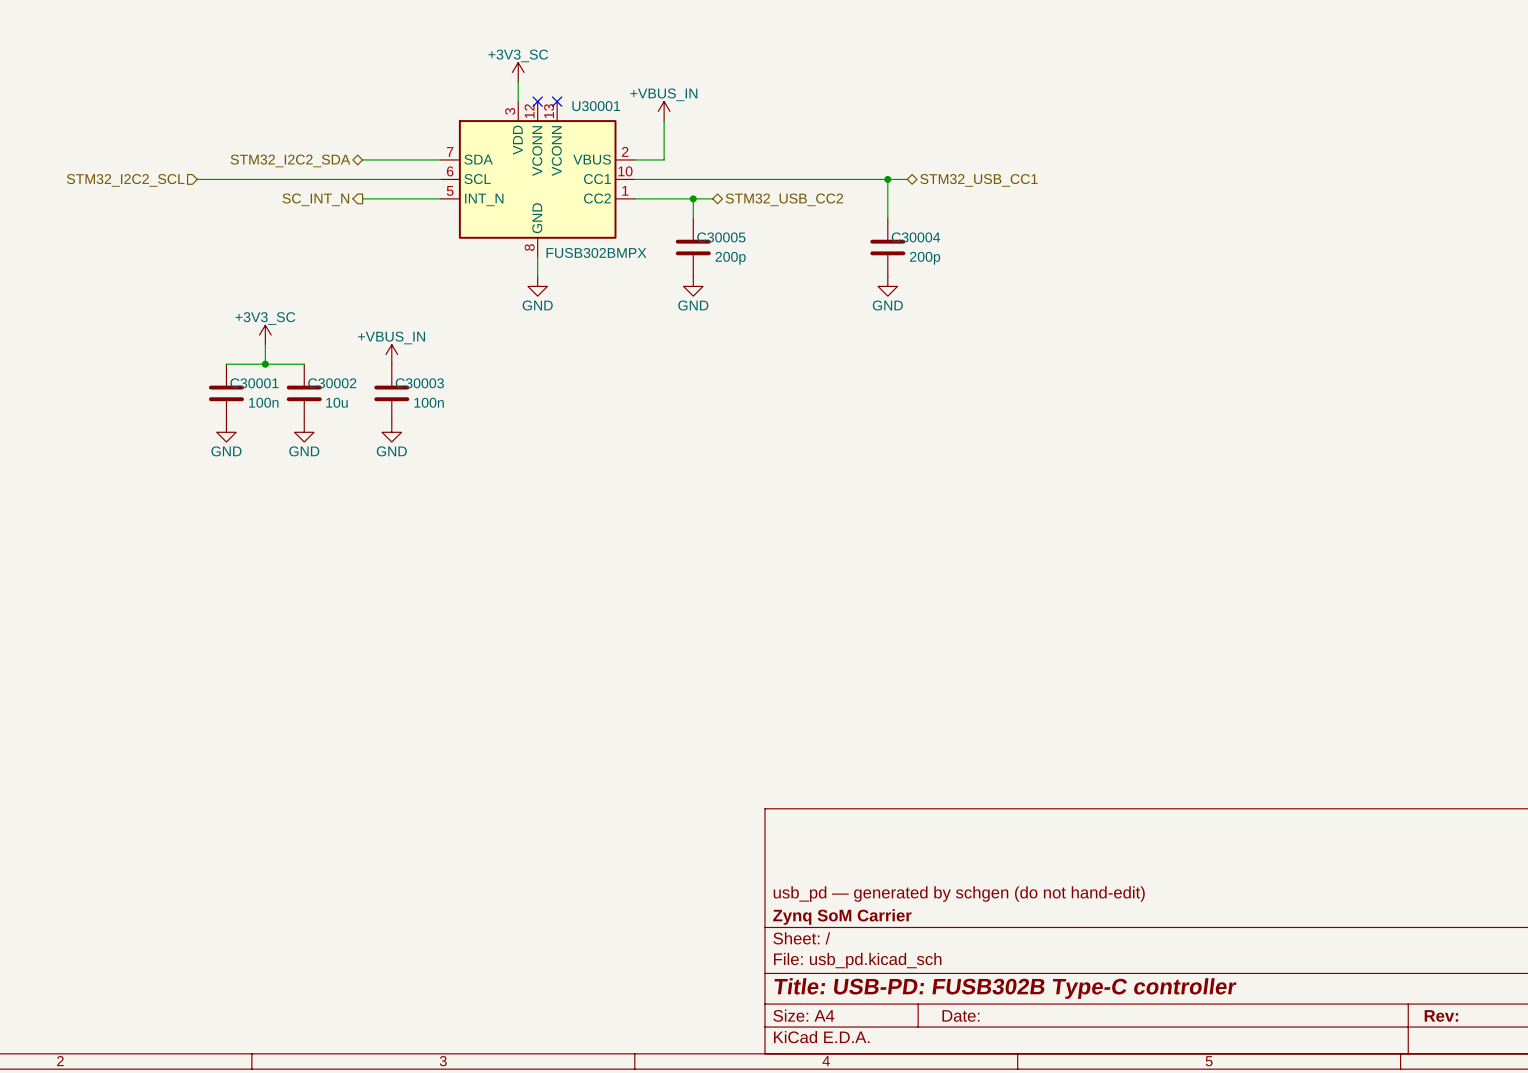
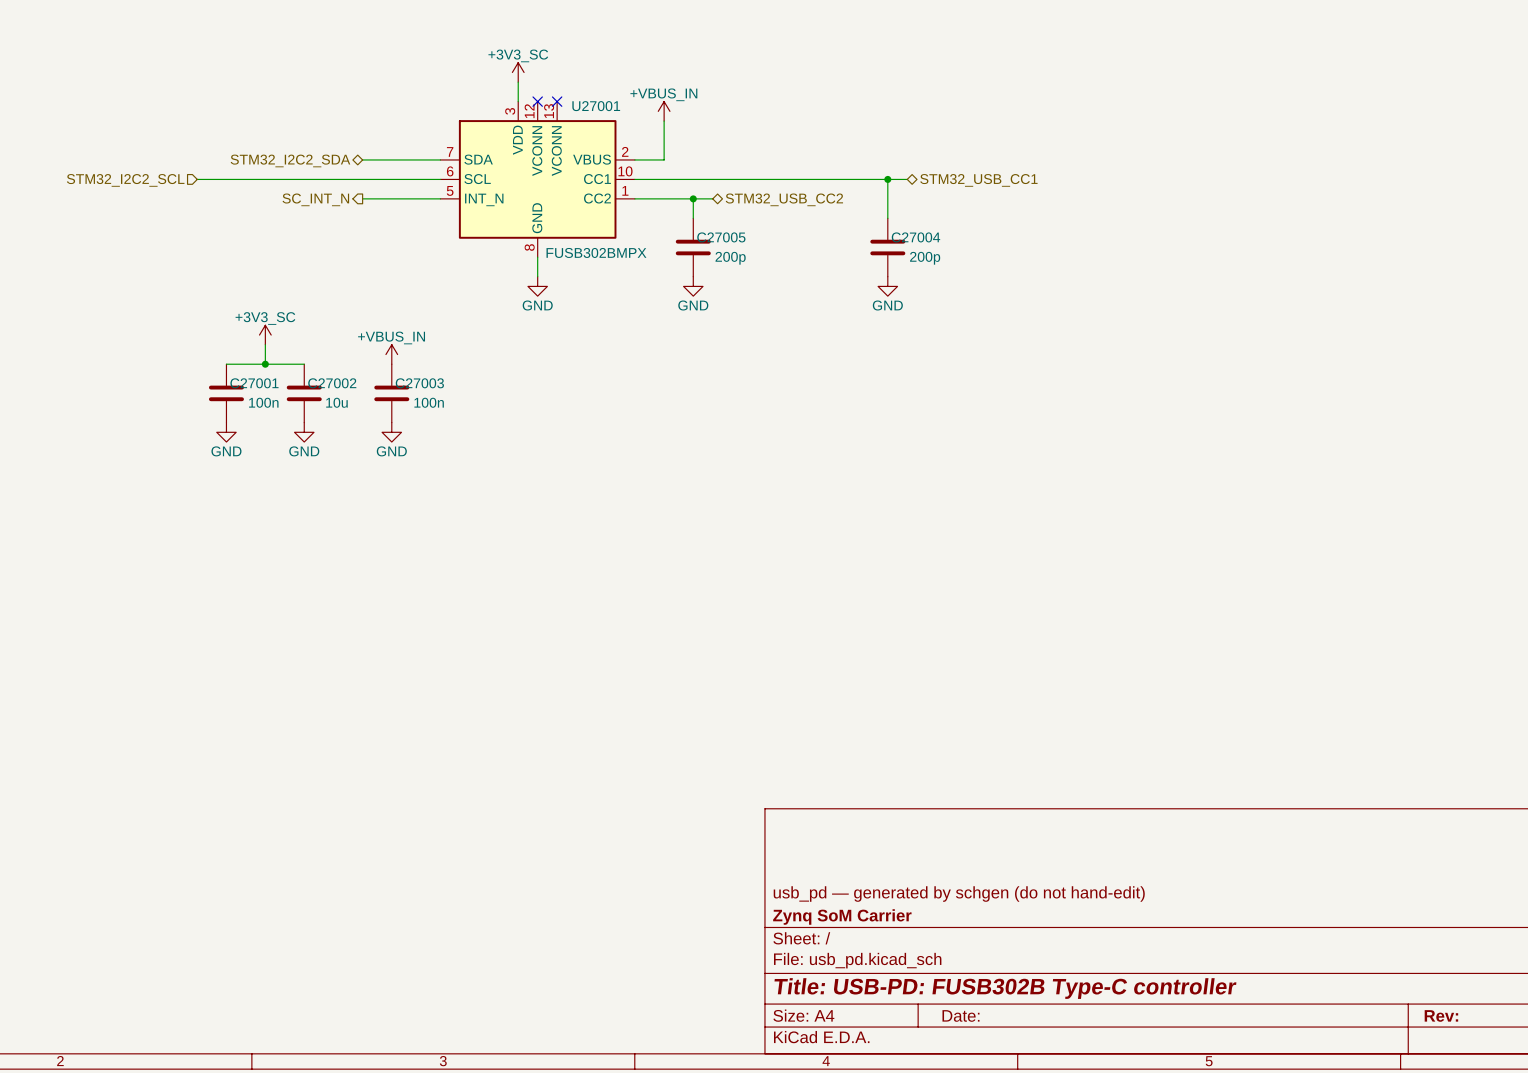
U30001 name: U30001 (596, 106) -> U27001 (596, 106)
C30005 name: C30005 (721, 237) -> C27005 (721, 237)
C30004 name: C30004 (915, 237) -> C27004 (915, 237)
C30001 name: C30001 (254, 383) -> C27001 (254, 383)
C30002 name: C30002 (332, 383) -> C27002 (332, 383)
C30003 name: C30003 (419, 383) -> C27003 (419, 383)

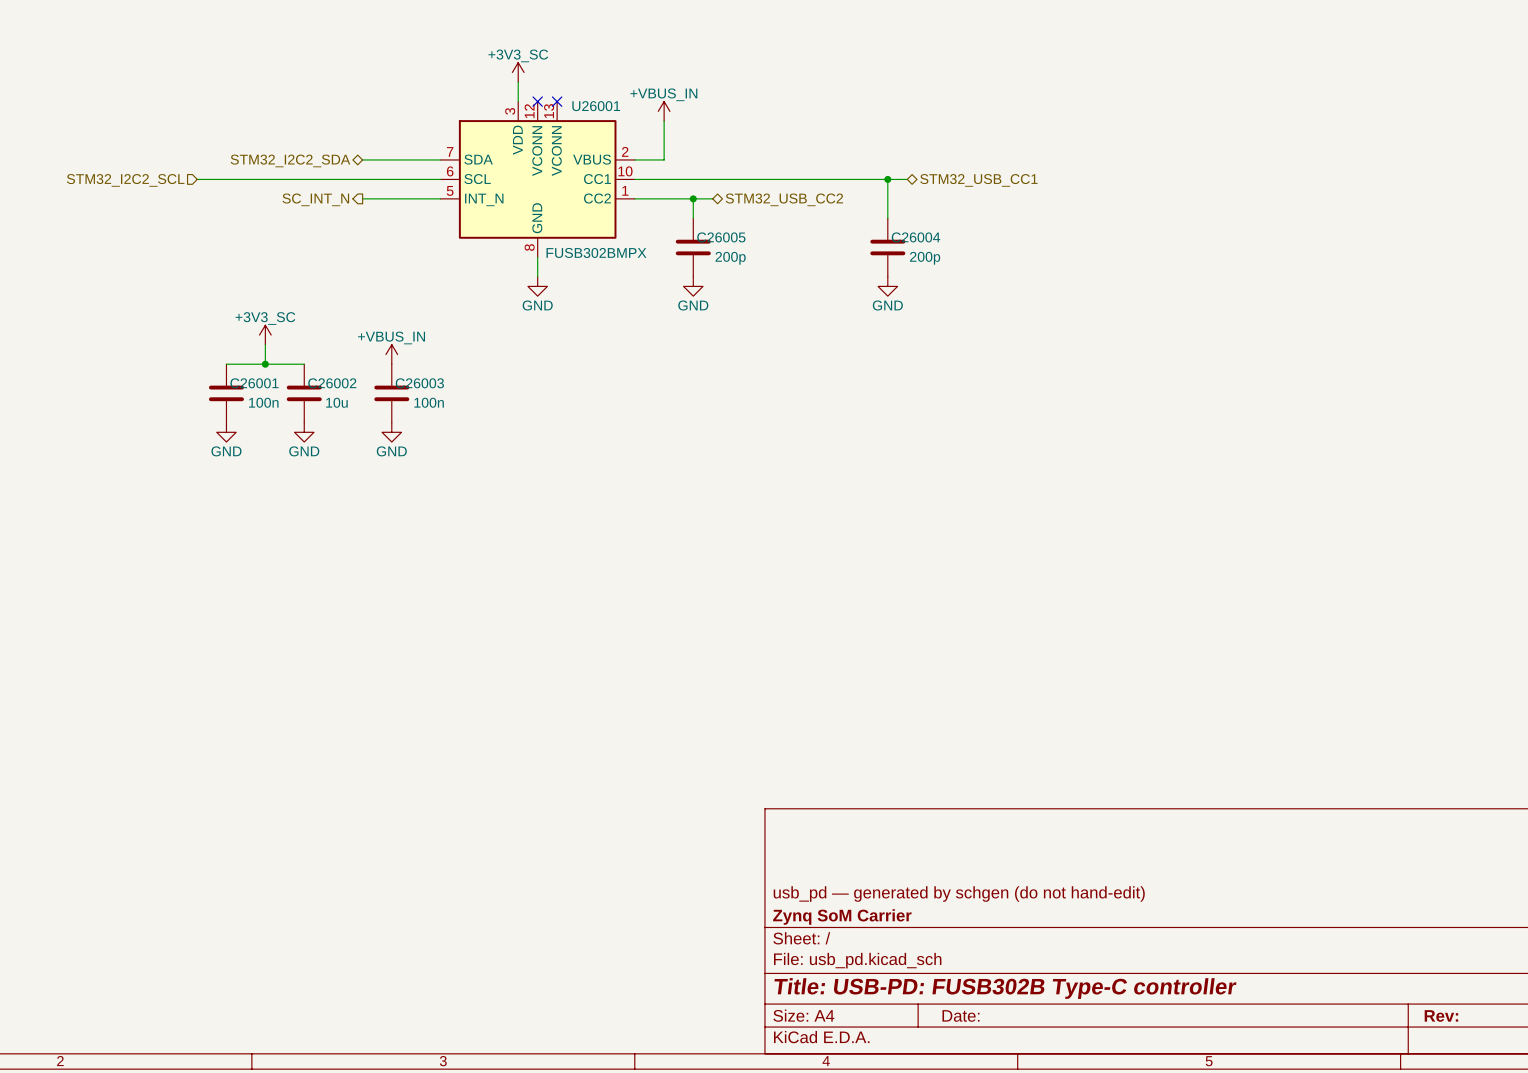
U27001 name: U27001 (596, 106) -> U26001 (596, 106)
C27005 name: C27005 (721, 237) -> C26005 (721, 237)
C27004 name: C27004 (915, 237) -> C26004 (915, 237)
C27001 name: C27001 (254, 383) -> C26001 (254, 383)
C27002 name: C27002 (332, 383) -> C26002 (332, 383)
C27003 name: C27003 (419, 383) -> C26003 (419, 383)

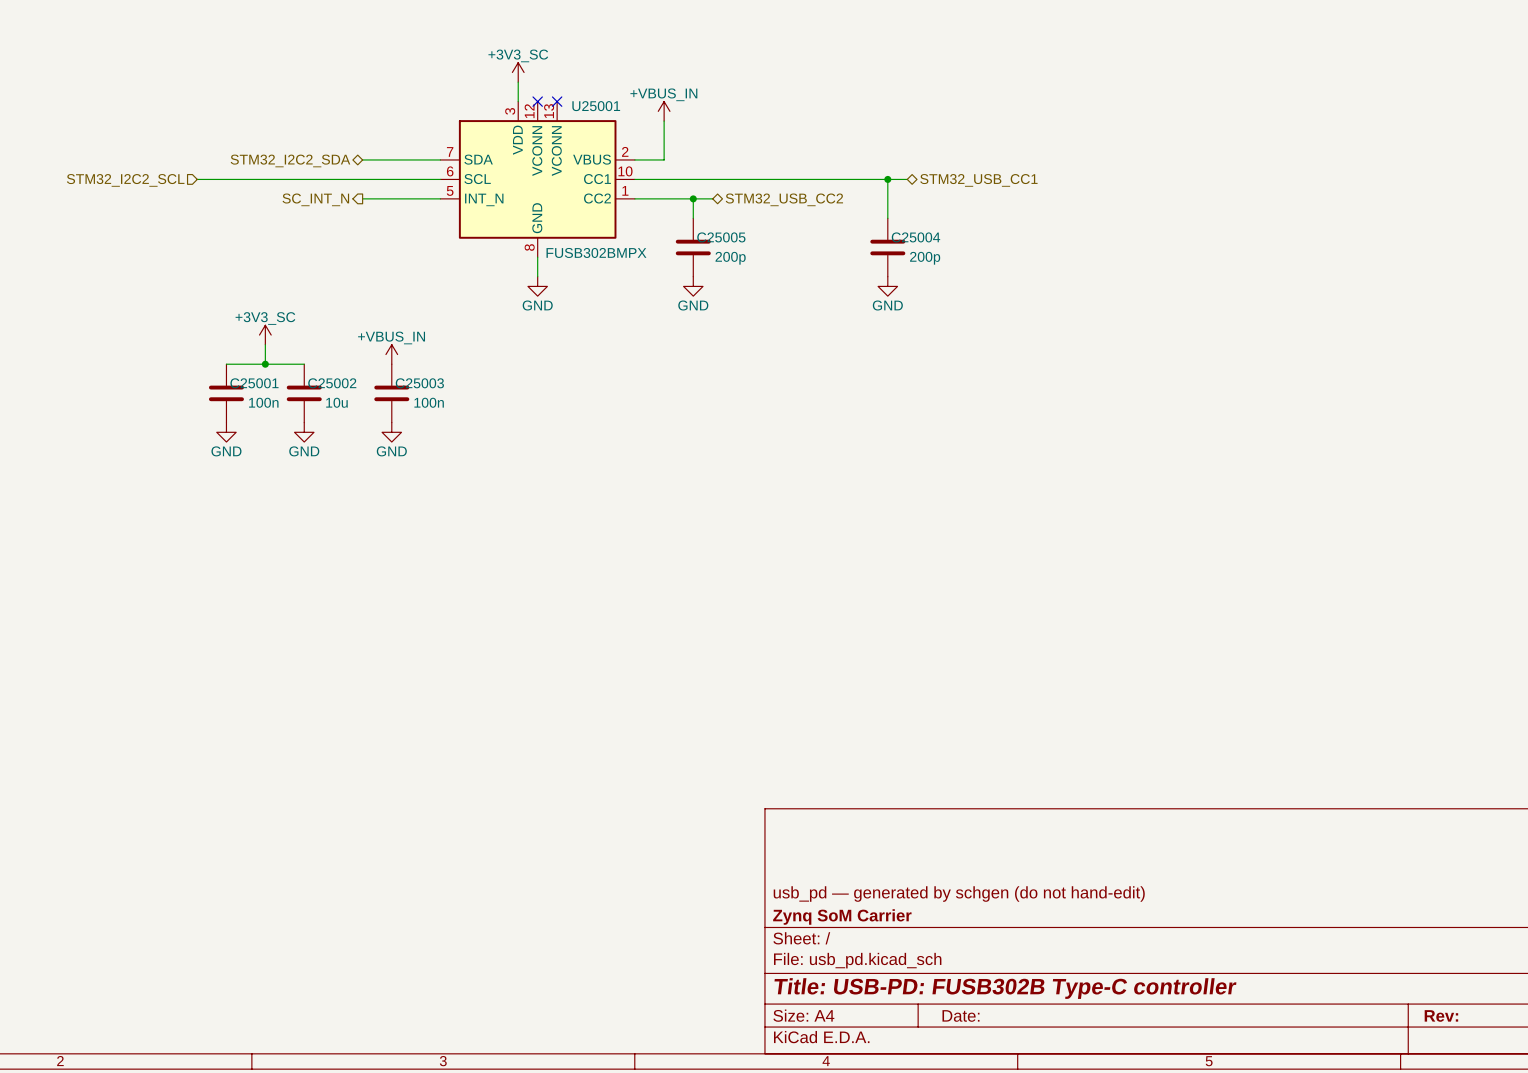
U26001 name: U26001 (596, 106) -> U25001 (596, 106)
C26005 name: C26005 (721, 237) -> C25005 (721, 237)
C26004 name: C26004 (915, 237) -> C25004 (915, 237)
C26001 name: C26001 (254, 383) -> C25001 (254, 383)
C26002 name: C26002 (332, 383) -> C25002 (332, 383)
C26003 name: C26003 (419, 383) -> C25003 (419, 383)

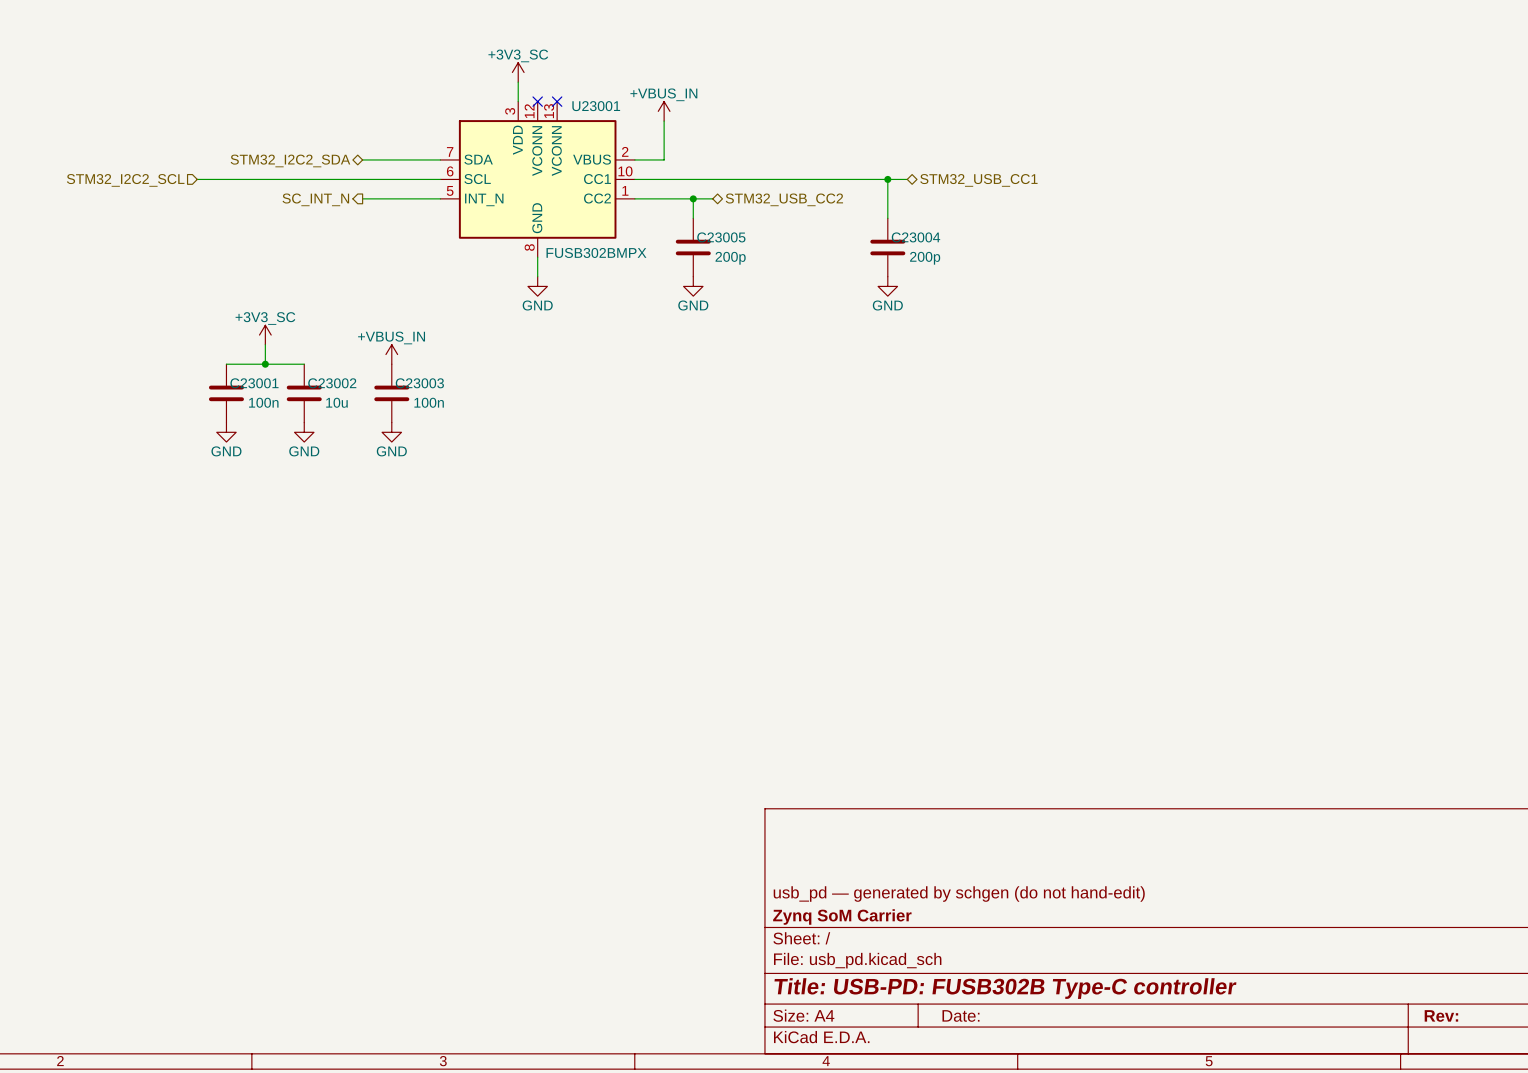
U25001 name: U25001 (596, 106) -> U23001 (596, 106)
C25005 name: C25005 (721, 237) -> C23005 (721, 237)
C25004 name: C25004 (915, 237) -> C23004 (915, 237)
C25001 name: C25001 (254, 383) -> C23001 (254, 383)
C25002 name: C25002 (332, 383) -> C23002 (332, 383)
C25003 name: C25003 (419, 383) -> C23003 (419, 383)

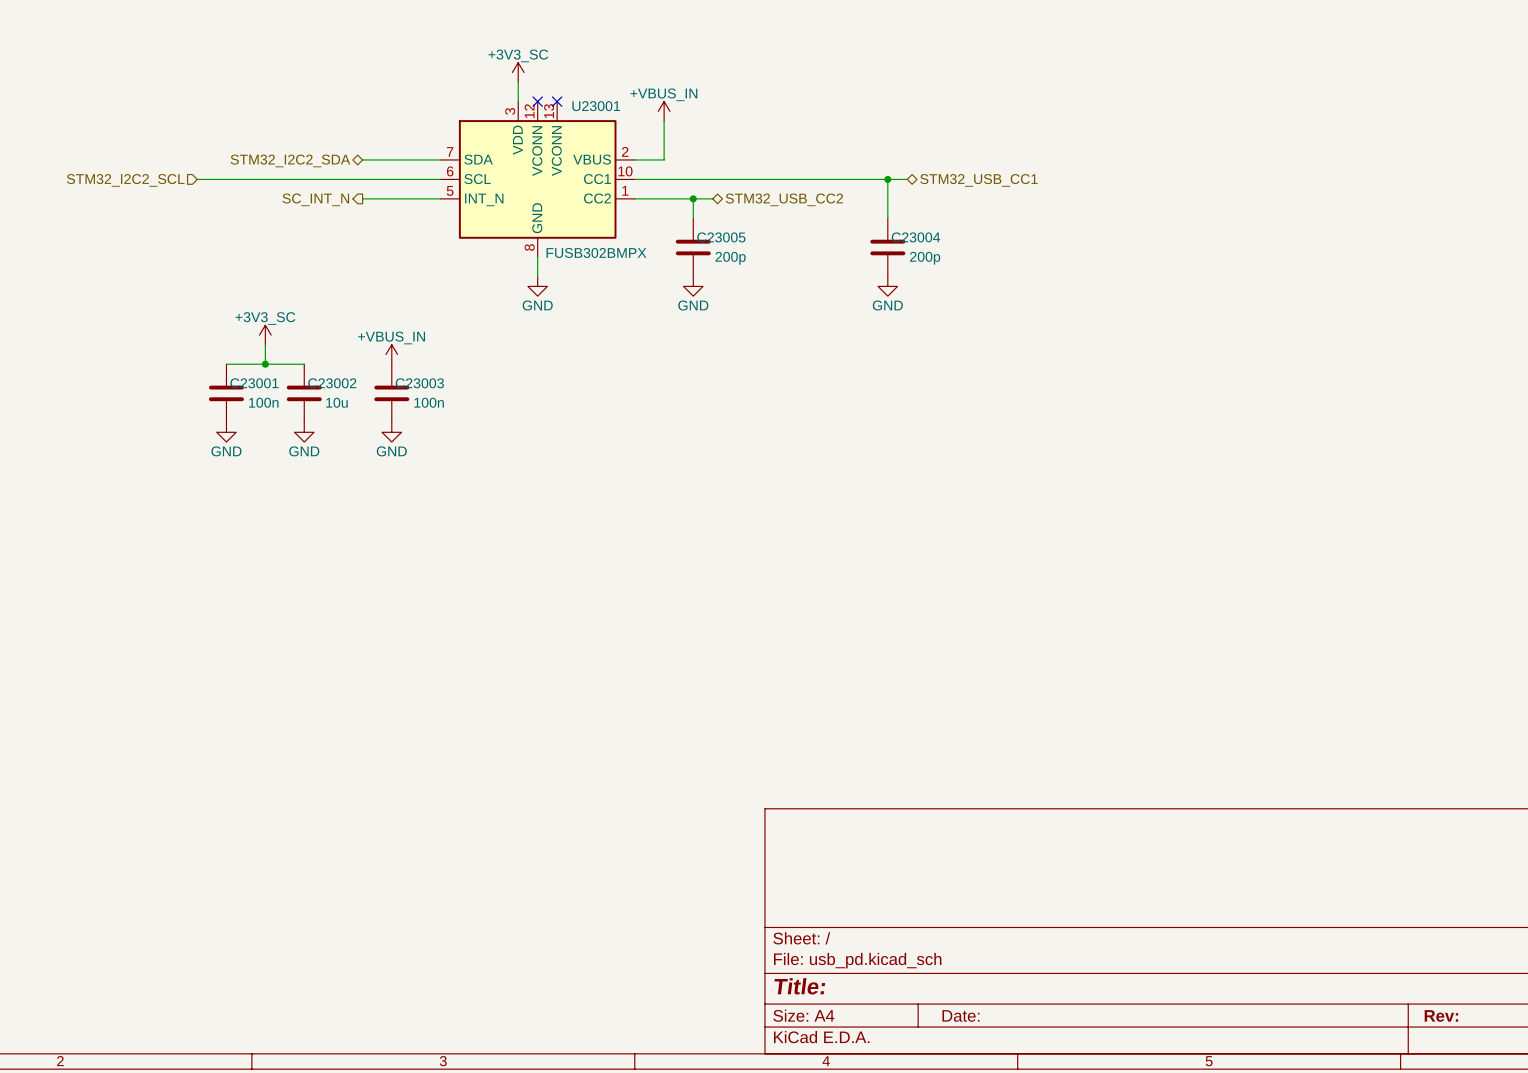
title block: usb_pd — generated by schgen (do not hand-edit) (959, 894) -> none
title block: Zynq SoM Carrier (842, 916) -> none
title block: Title: USB-PD: FUSB302B Type-C controller (1005, 988) -> Title: (799, 986)

